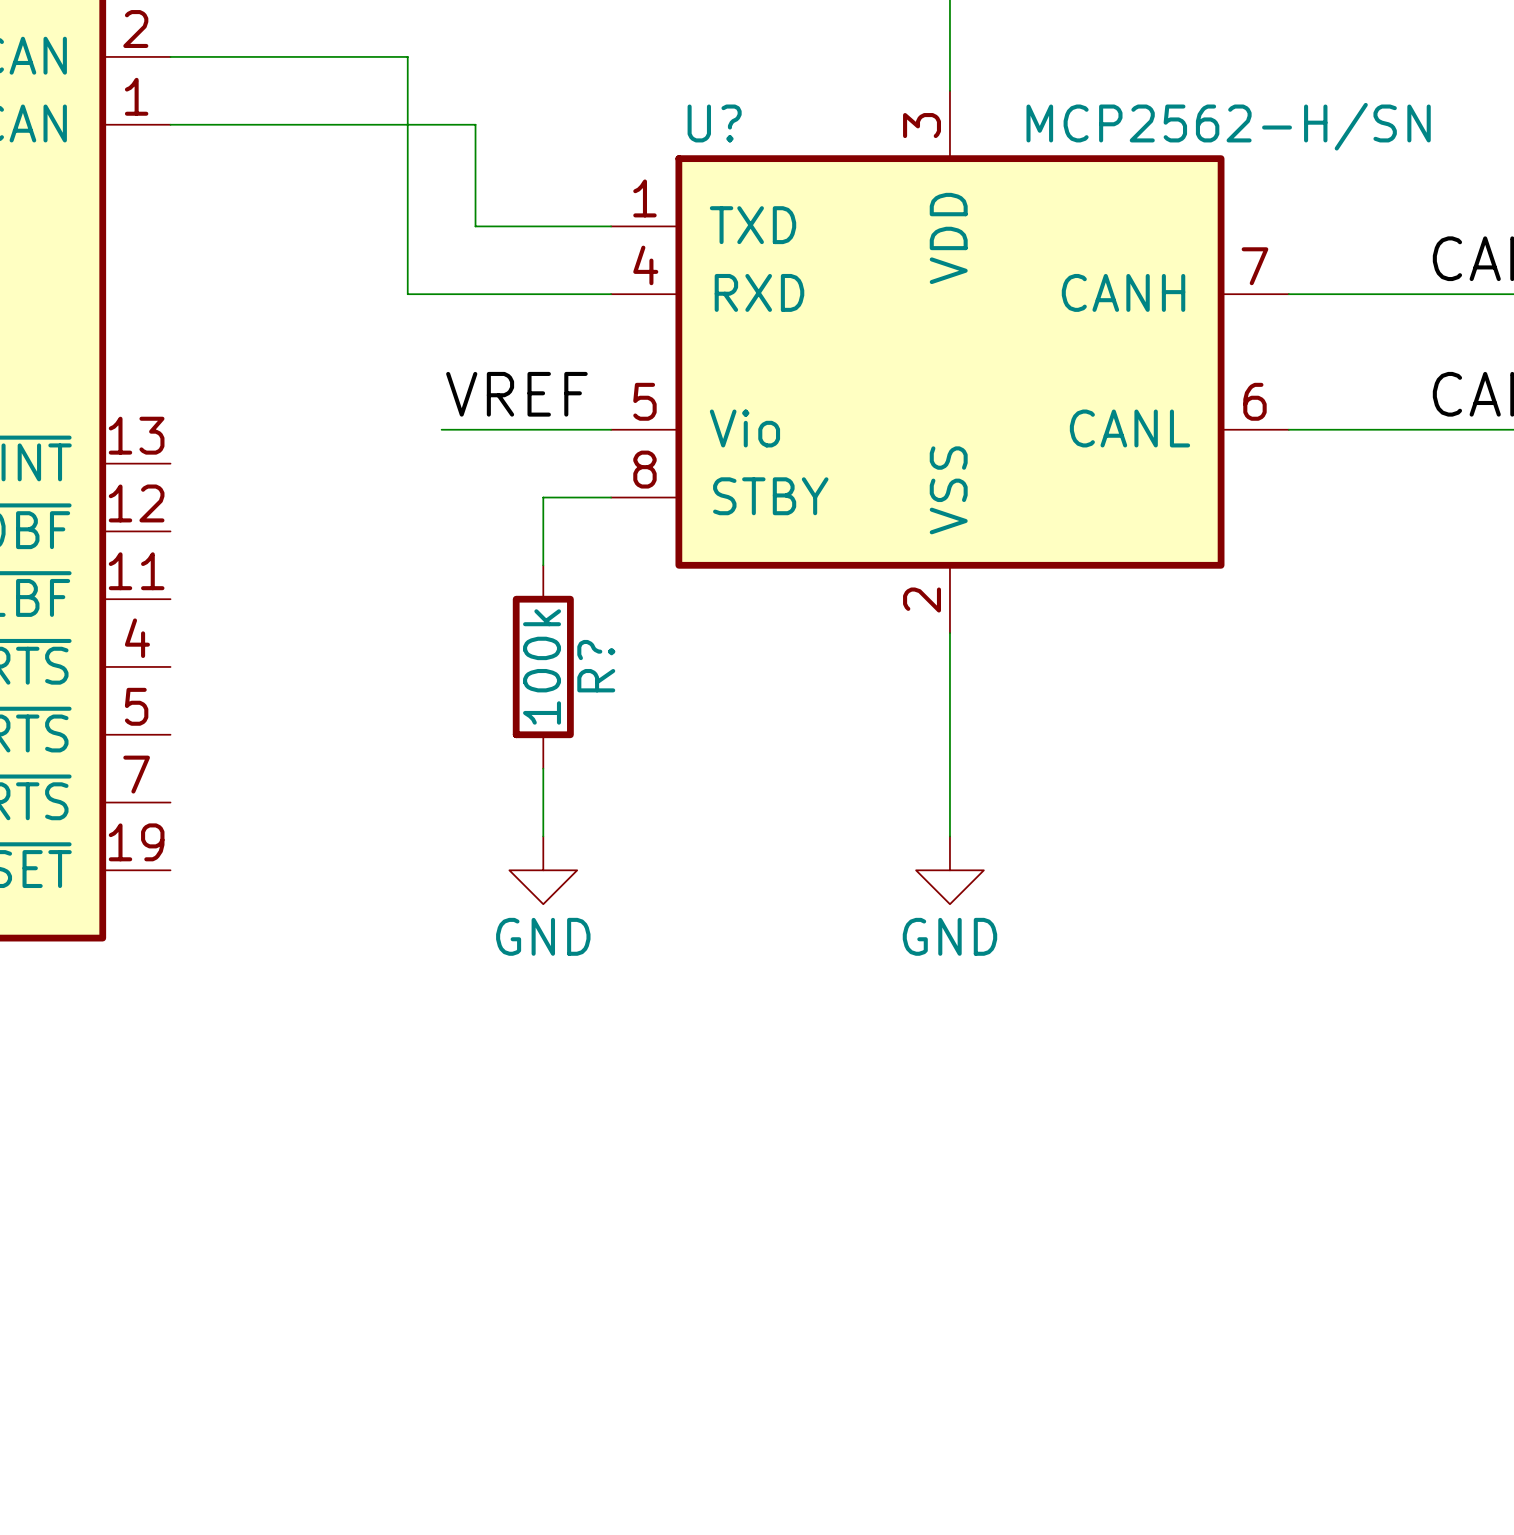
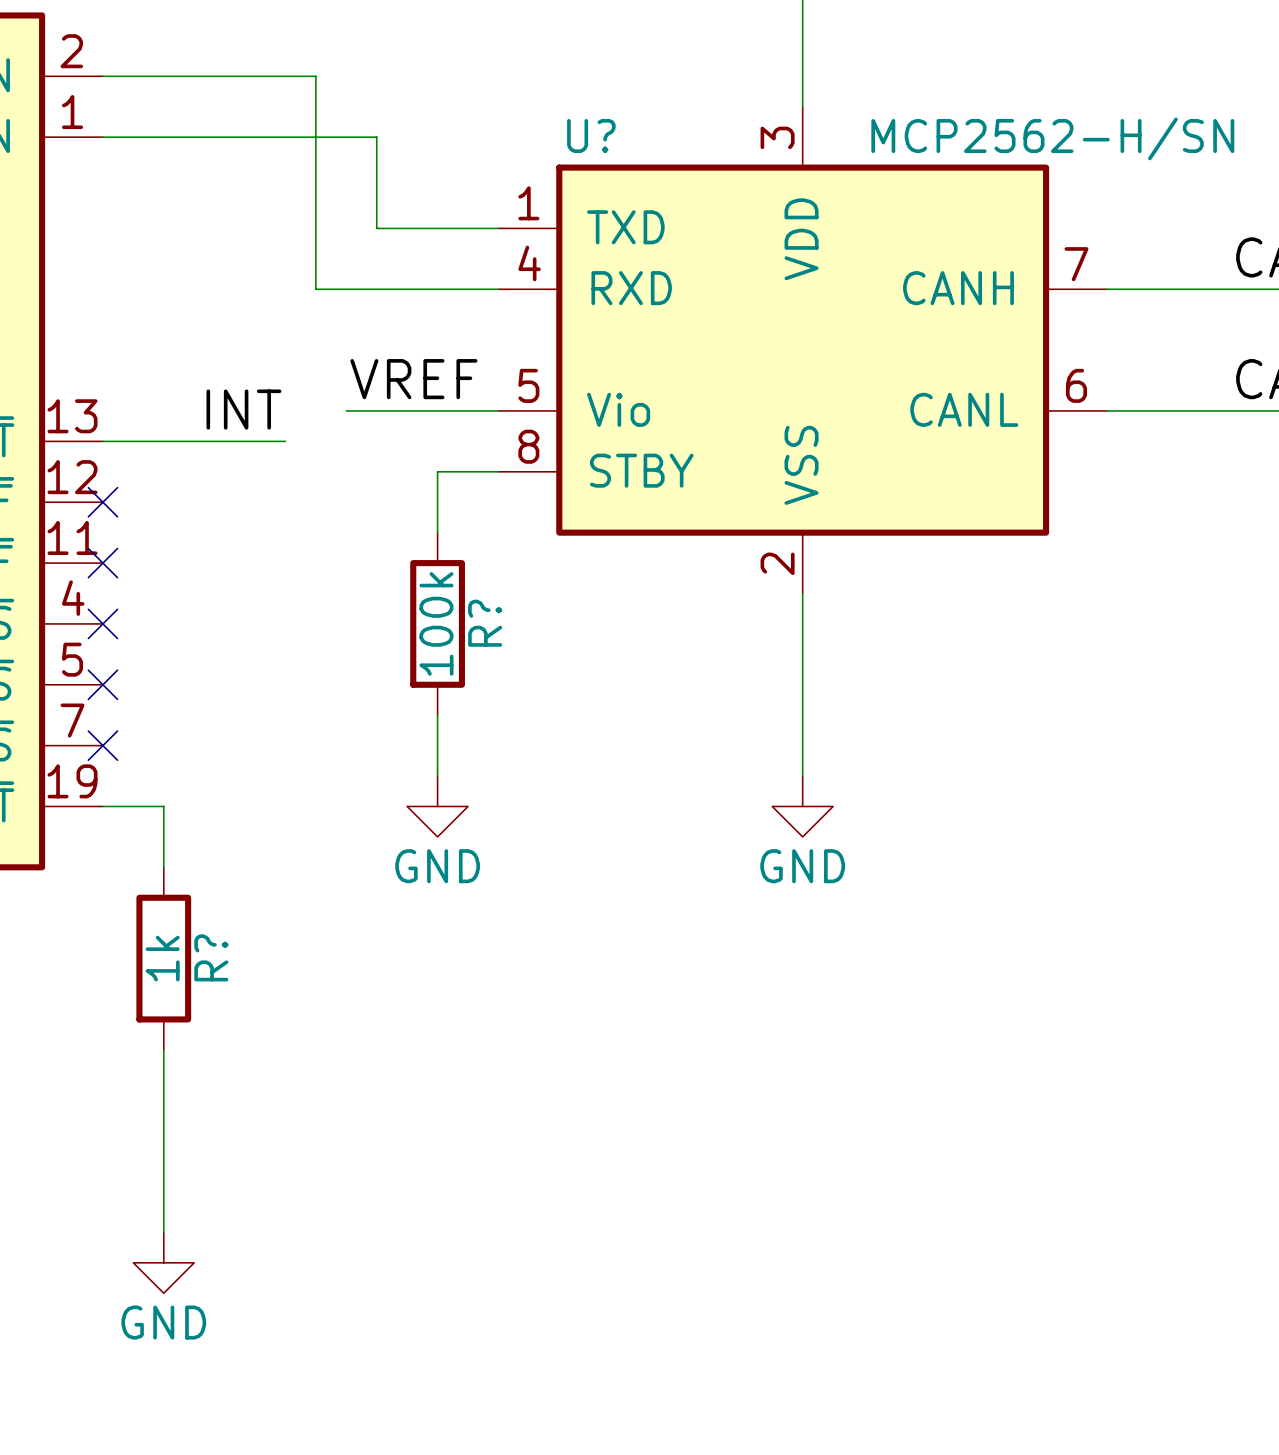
label: none -> INT (243, 409)
wire: none -> (102, 441) (285, 441)
no-connect mark: none -> (102, 502)
no-connect mark: none -> (102, 563)
no-connect mark: none -> (102, 623)
no-connect mark: none -> (102, 684)
no-connect mark: none -> (102, 745)
wire: none -> (102, 806) (163, 806) (163, 867)
R?: none -> 1k (163, 958)
wire: none -> (163, 1049) (163, 1232)
power symbol: none -> GND (163, 1262)

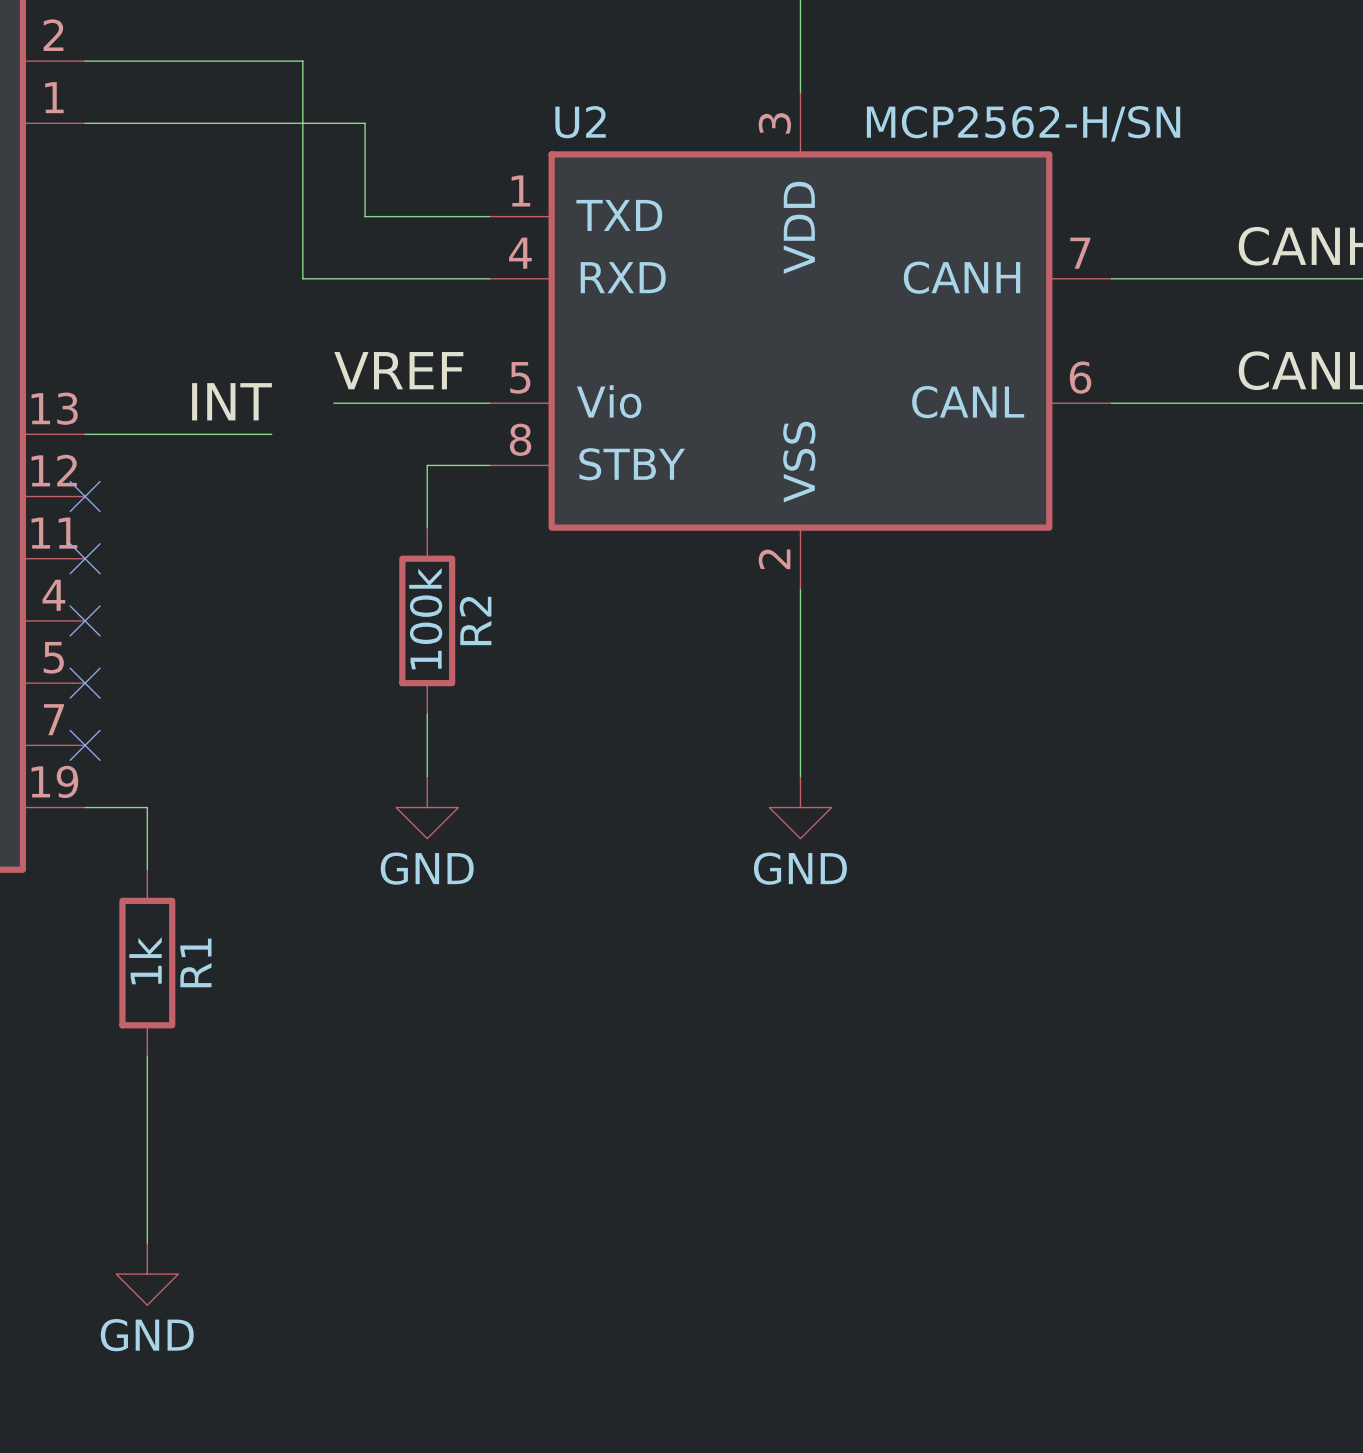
U? name: U? (591, 136) -> U2 (580, 122)
R? name: R? (485, 623) -> R2 (475, 620)
R? name: R? (211, 957) -> R1 (195, 962)

